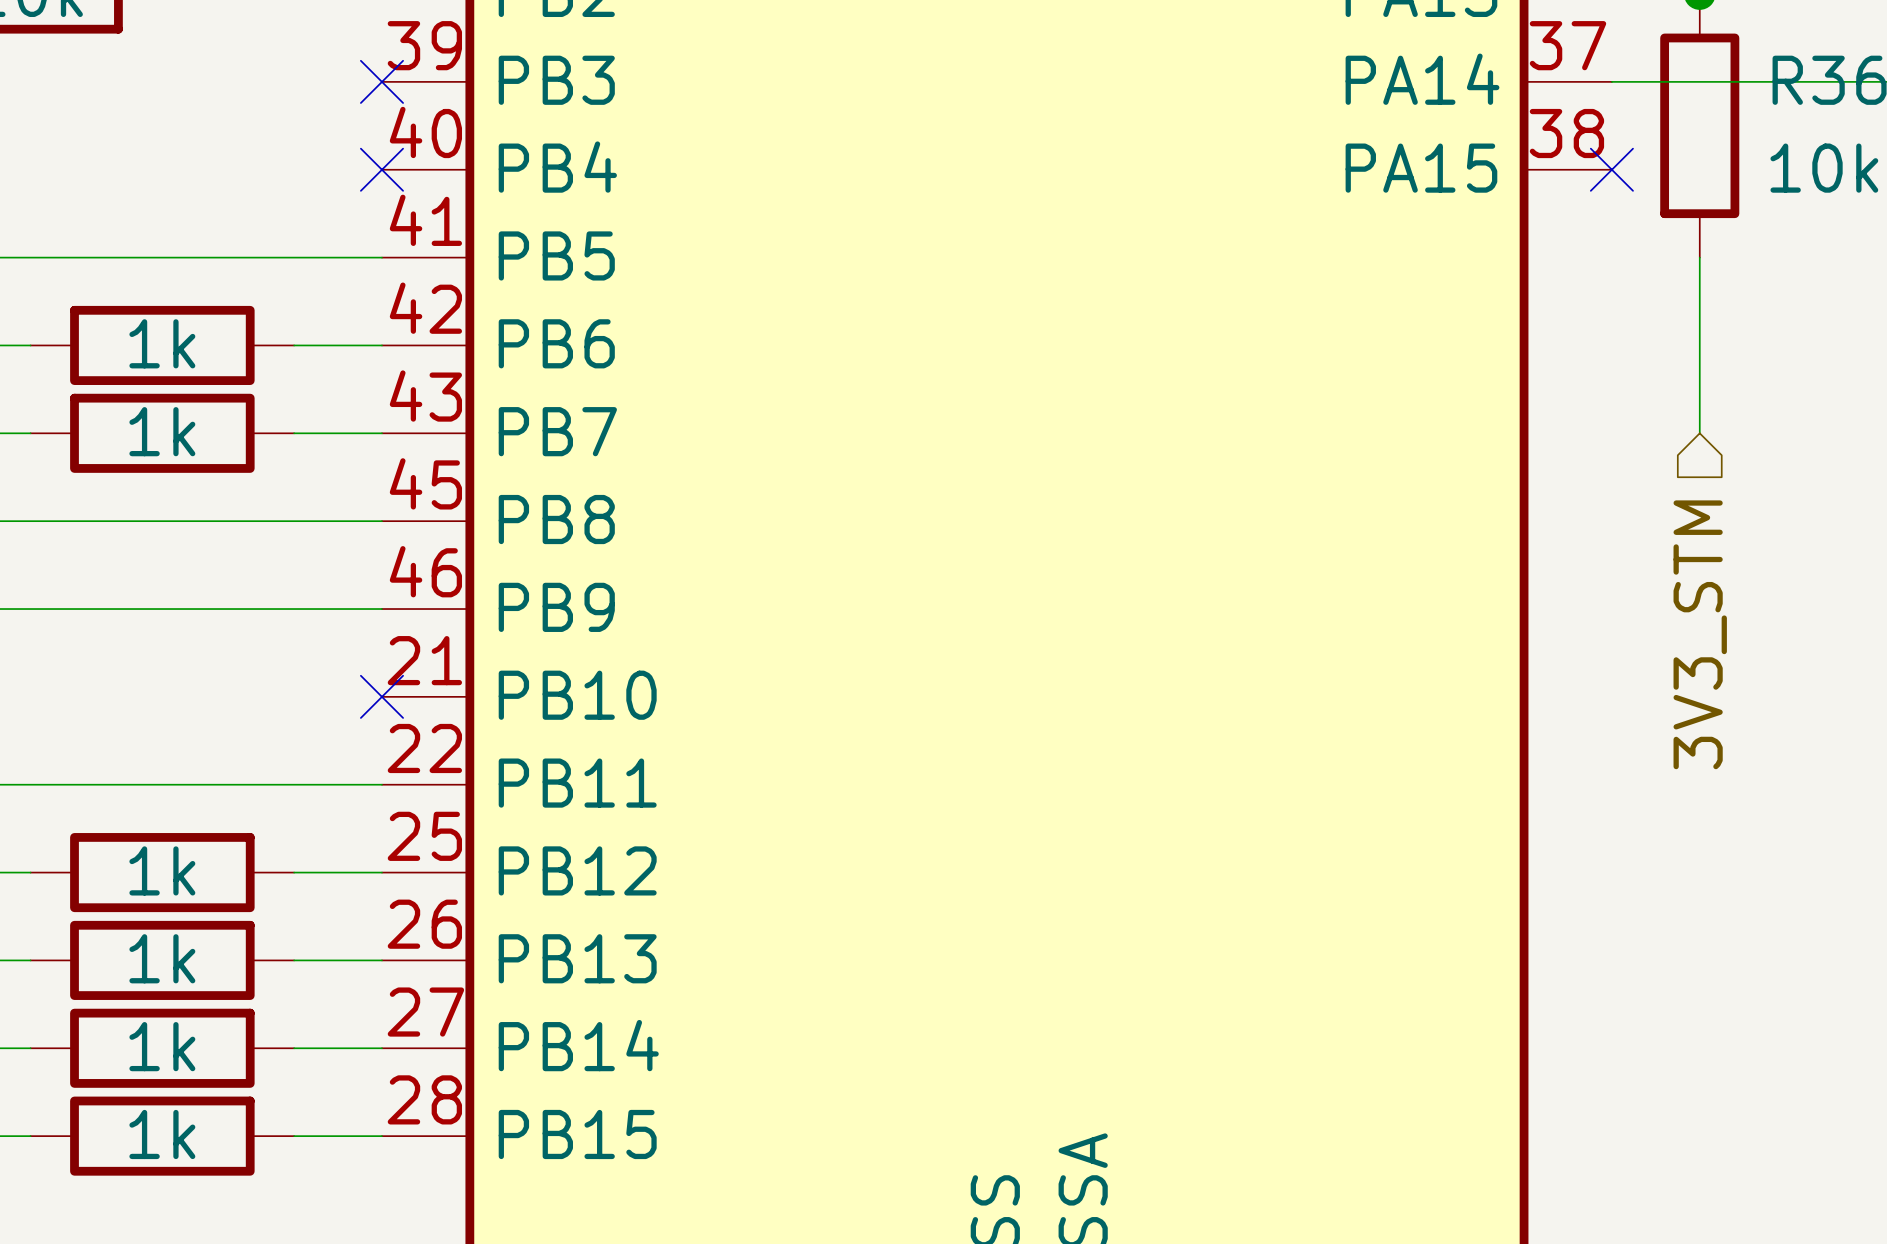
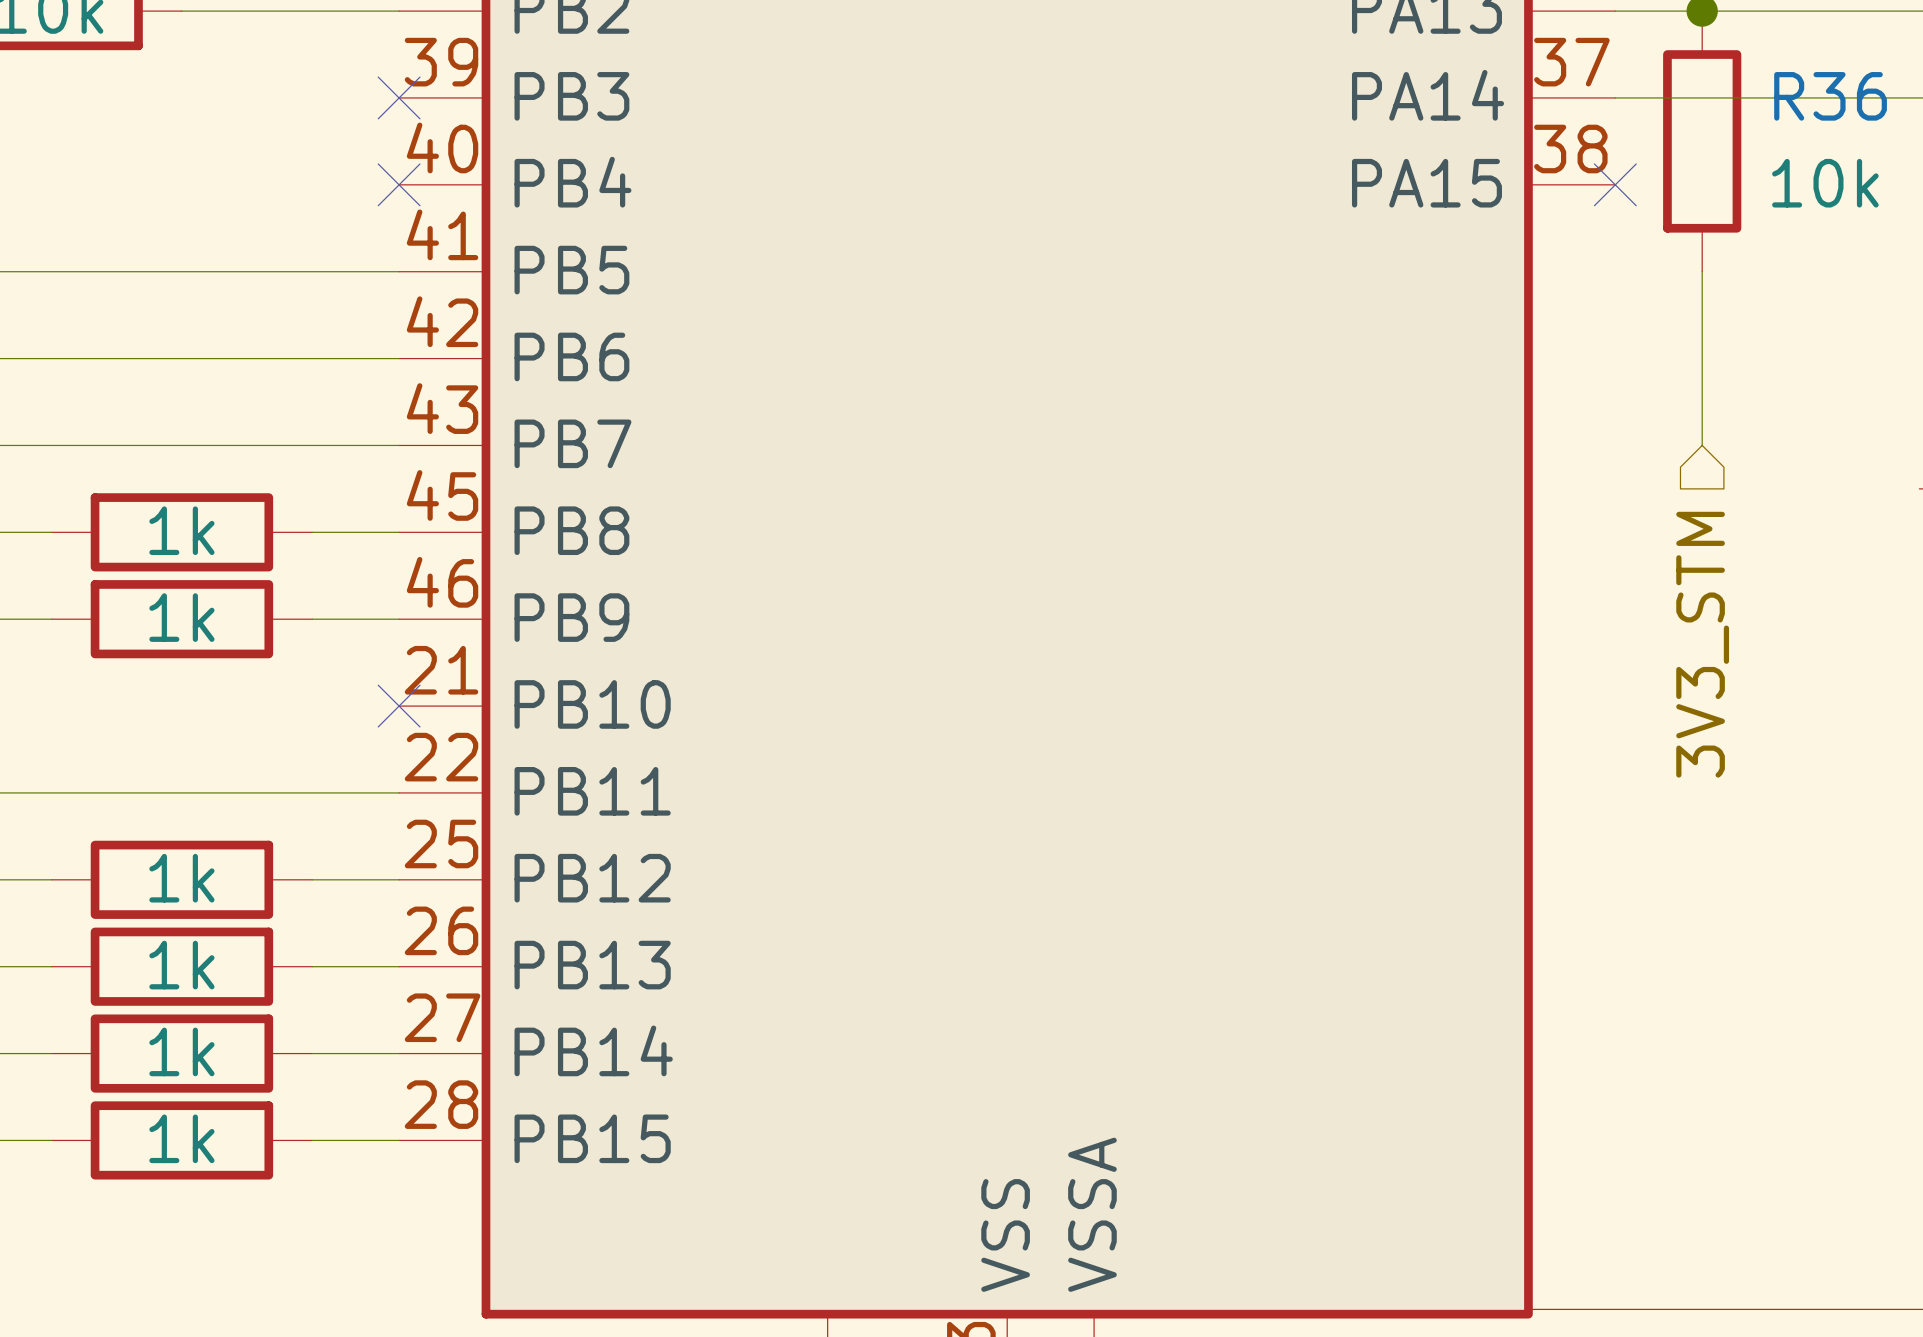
part: 1k (162, 345) -> none
part: 1k (162, 433) -> none
wire: (30, 521) (294, 521) -> (51, 445) (312, 445)
part: none -> 1k (181, 532)
wire: (30, 609) (294, 609) -> (51, 358) (312, 358)
part: none -> 1k (181, 619)

